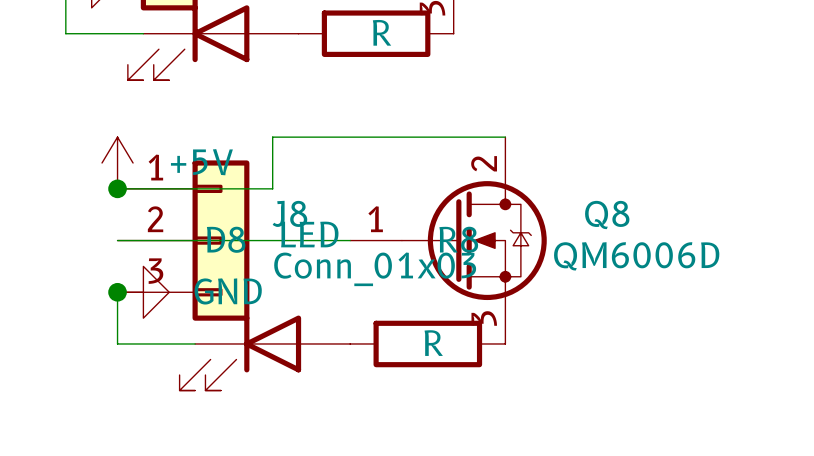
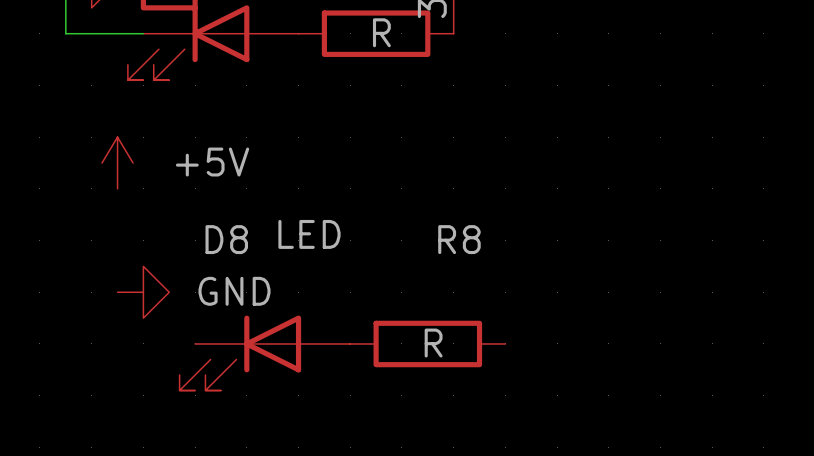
wire: (505, 137) (272, 137) (272, 188) (117, 188) -> none
junction: (117, 188) -> none
wire: (117, 240) (350, 240) -> none
J8: Conn_01x03 (183, 240) -> none
Q8: QM6006D (448, 240) -> none
wire: (117, 292) (117, 343) (195, 343) -> none
junction: (117, 292) -> none

